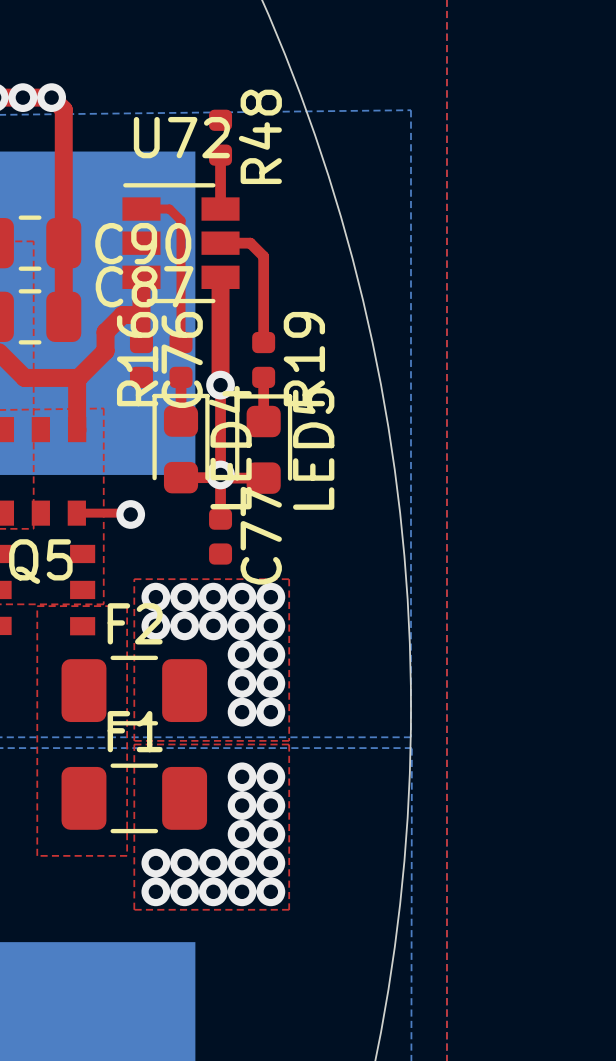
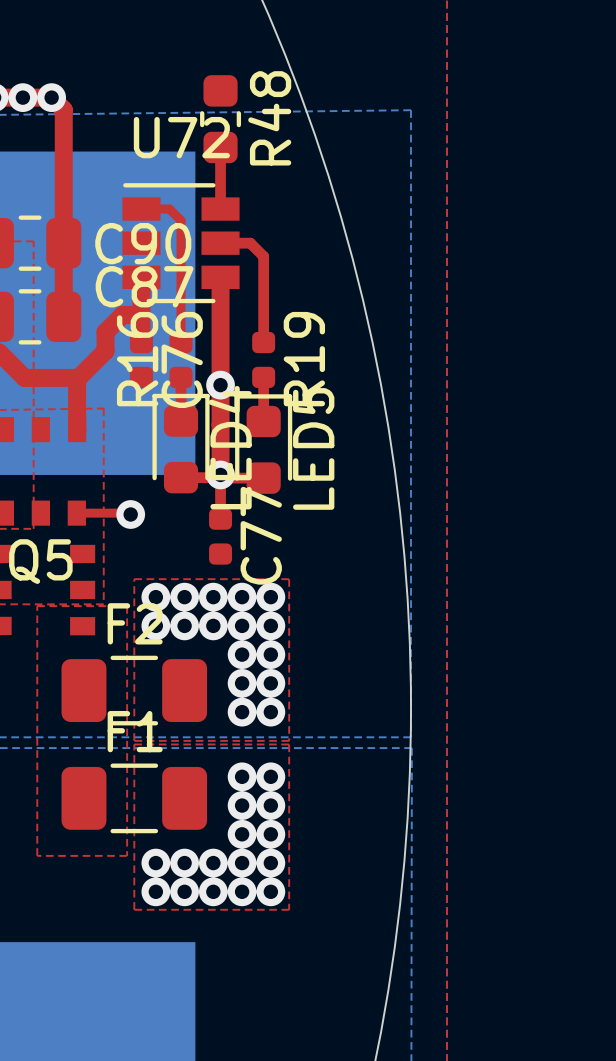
R48 footprint: [209, 109, 233, 166] -> [200, 75, 242, 164]
top track width: thin (220, 385) (220, 474) -> thick (220, 385) (220, 474)

